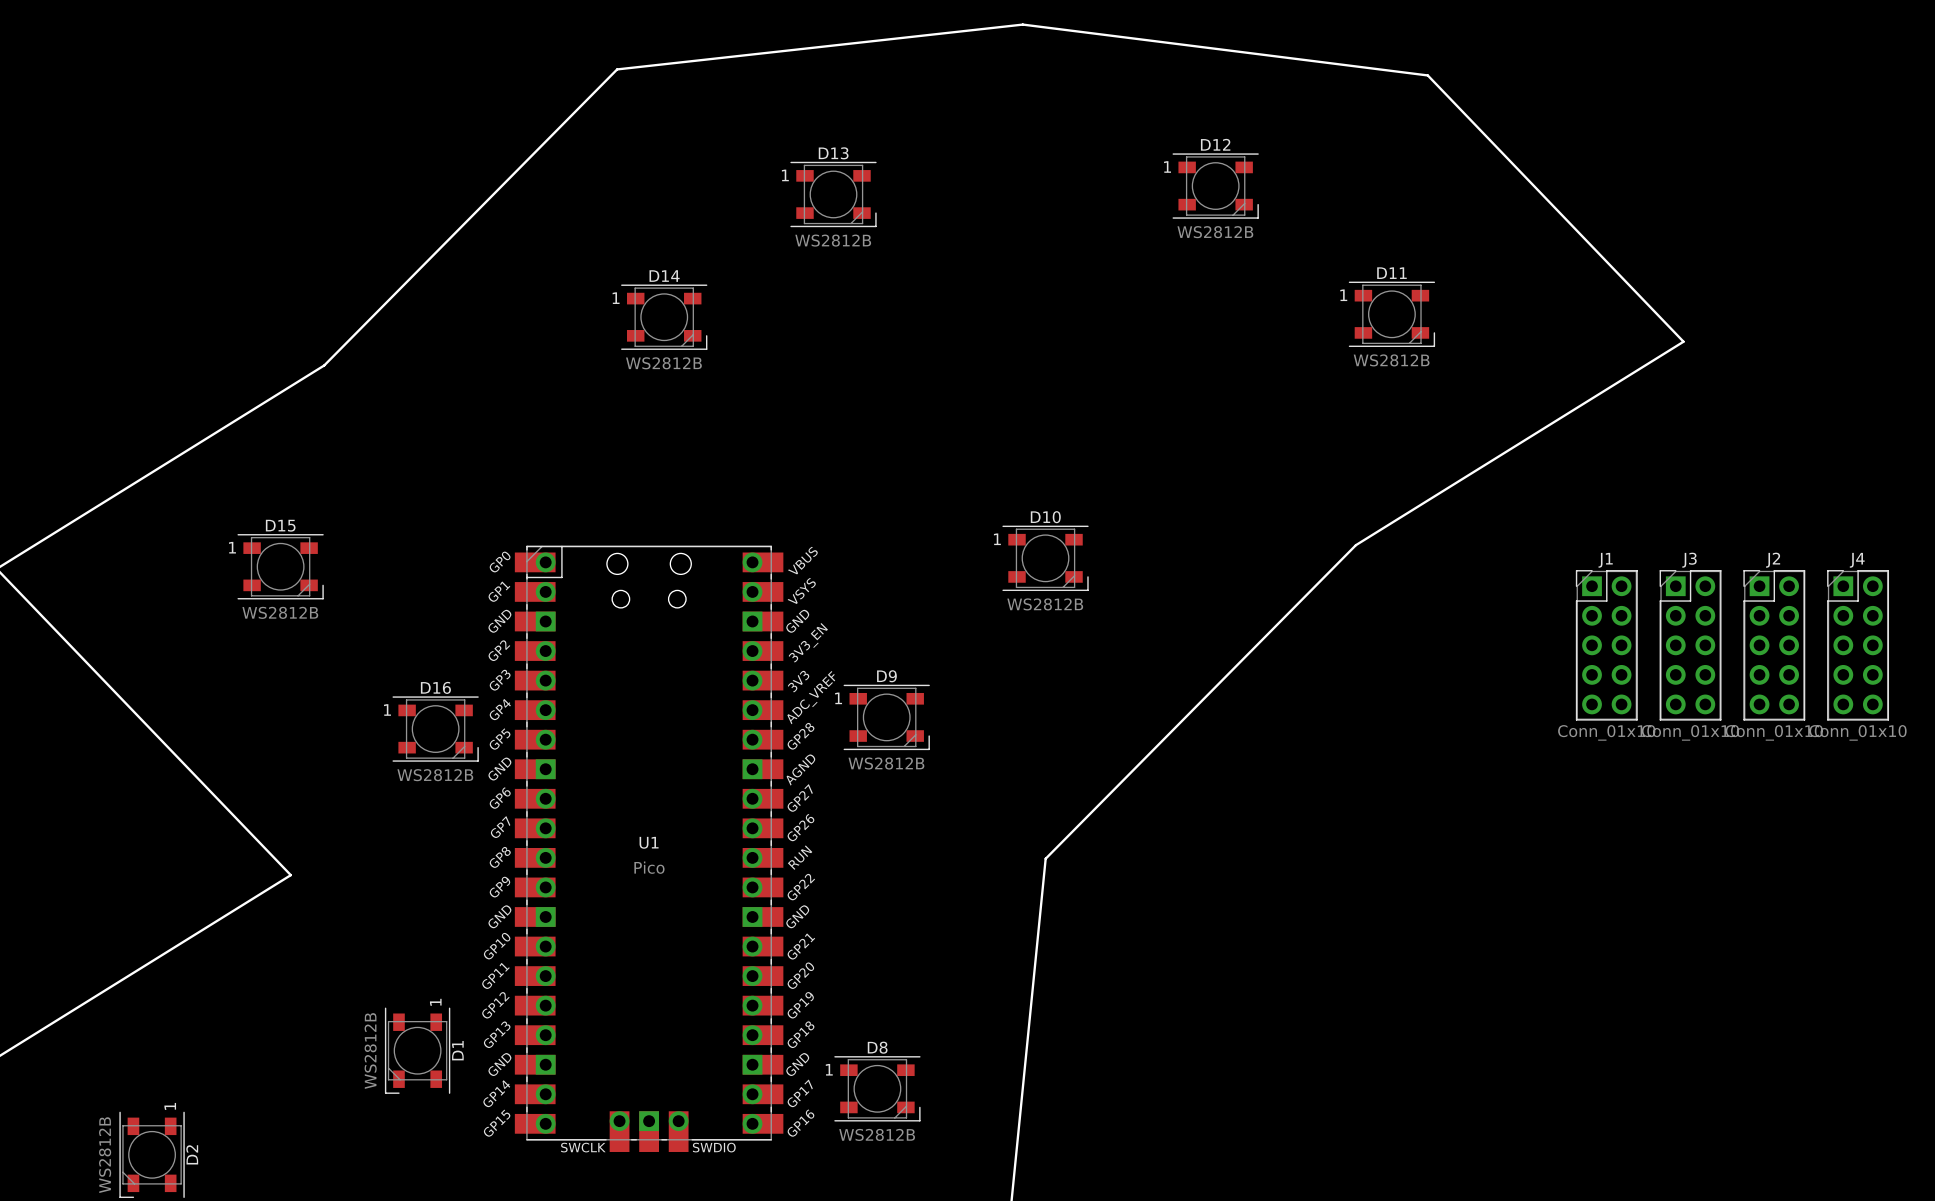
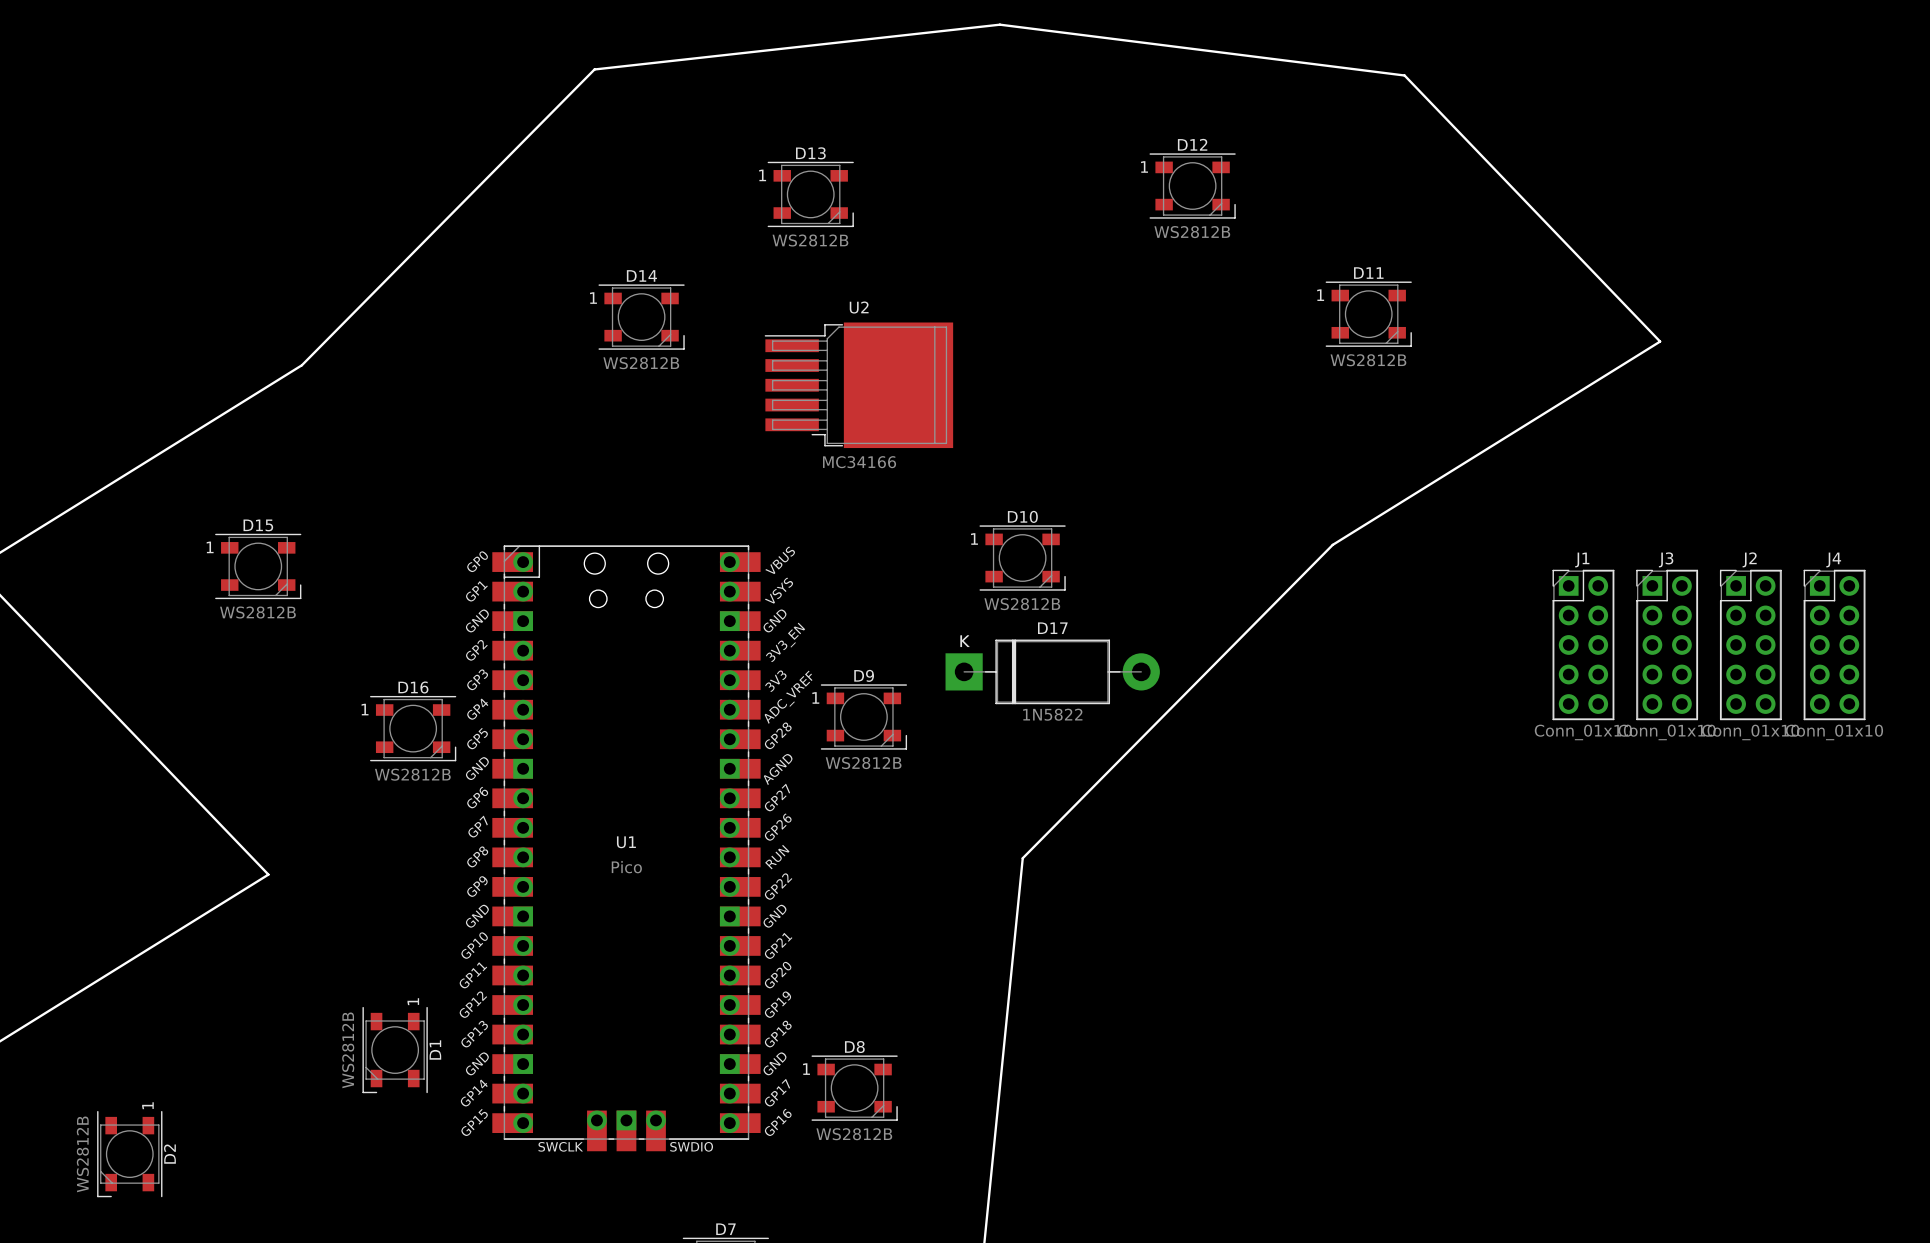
U2: none -> MC34166 (858, 385)
D17: none -> 1N5822 (1052, 671)

